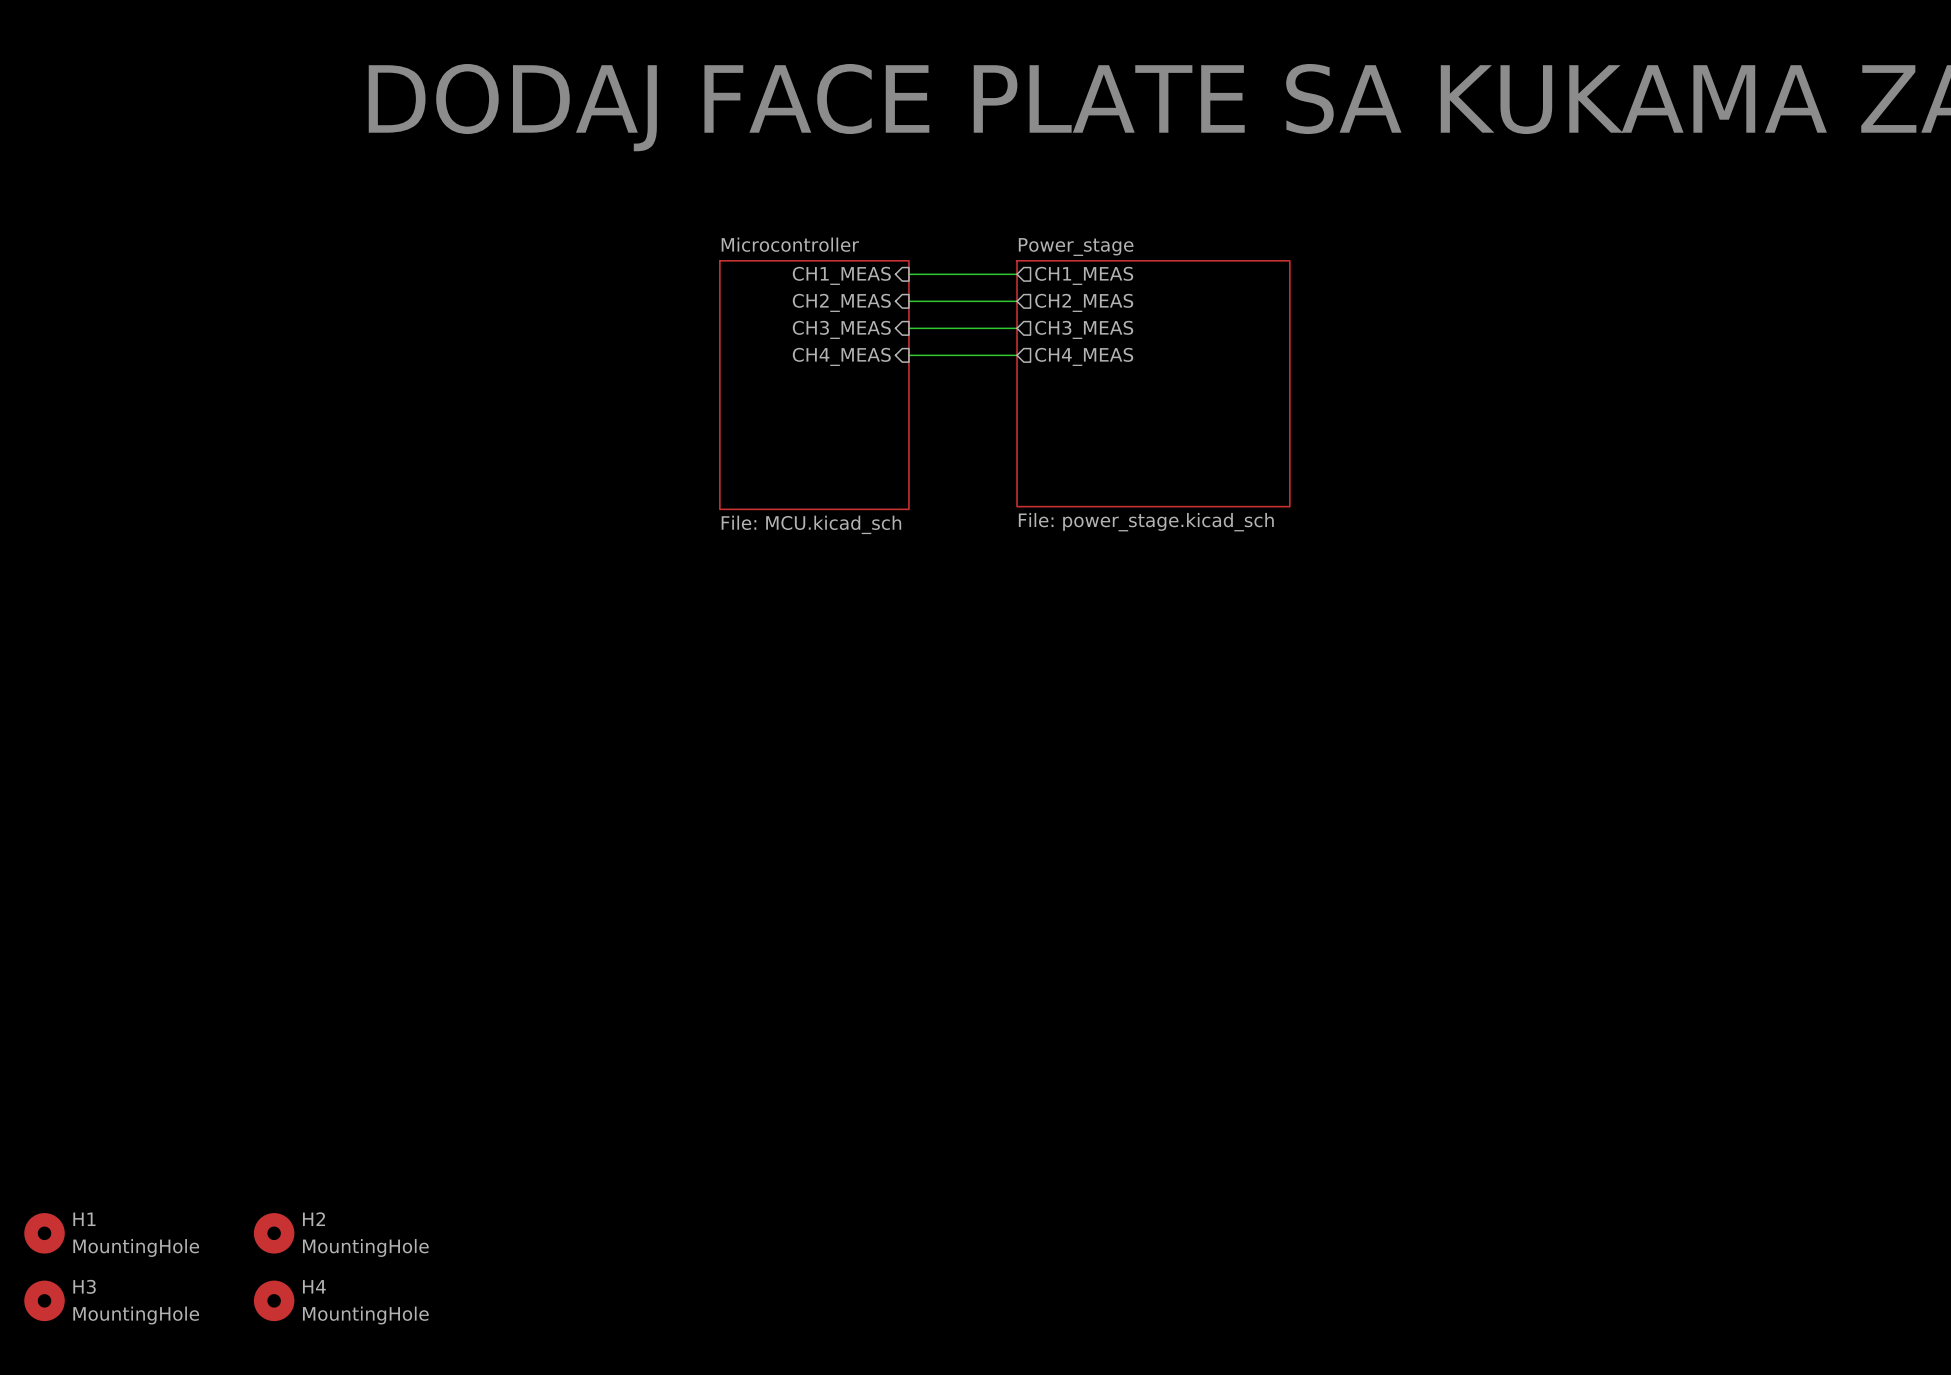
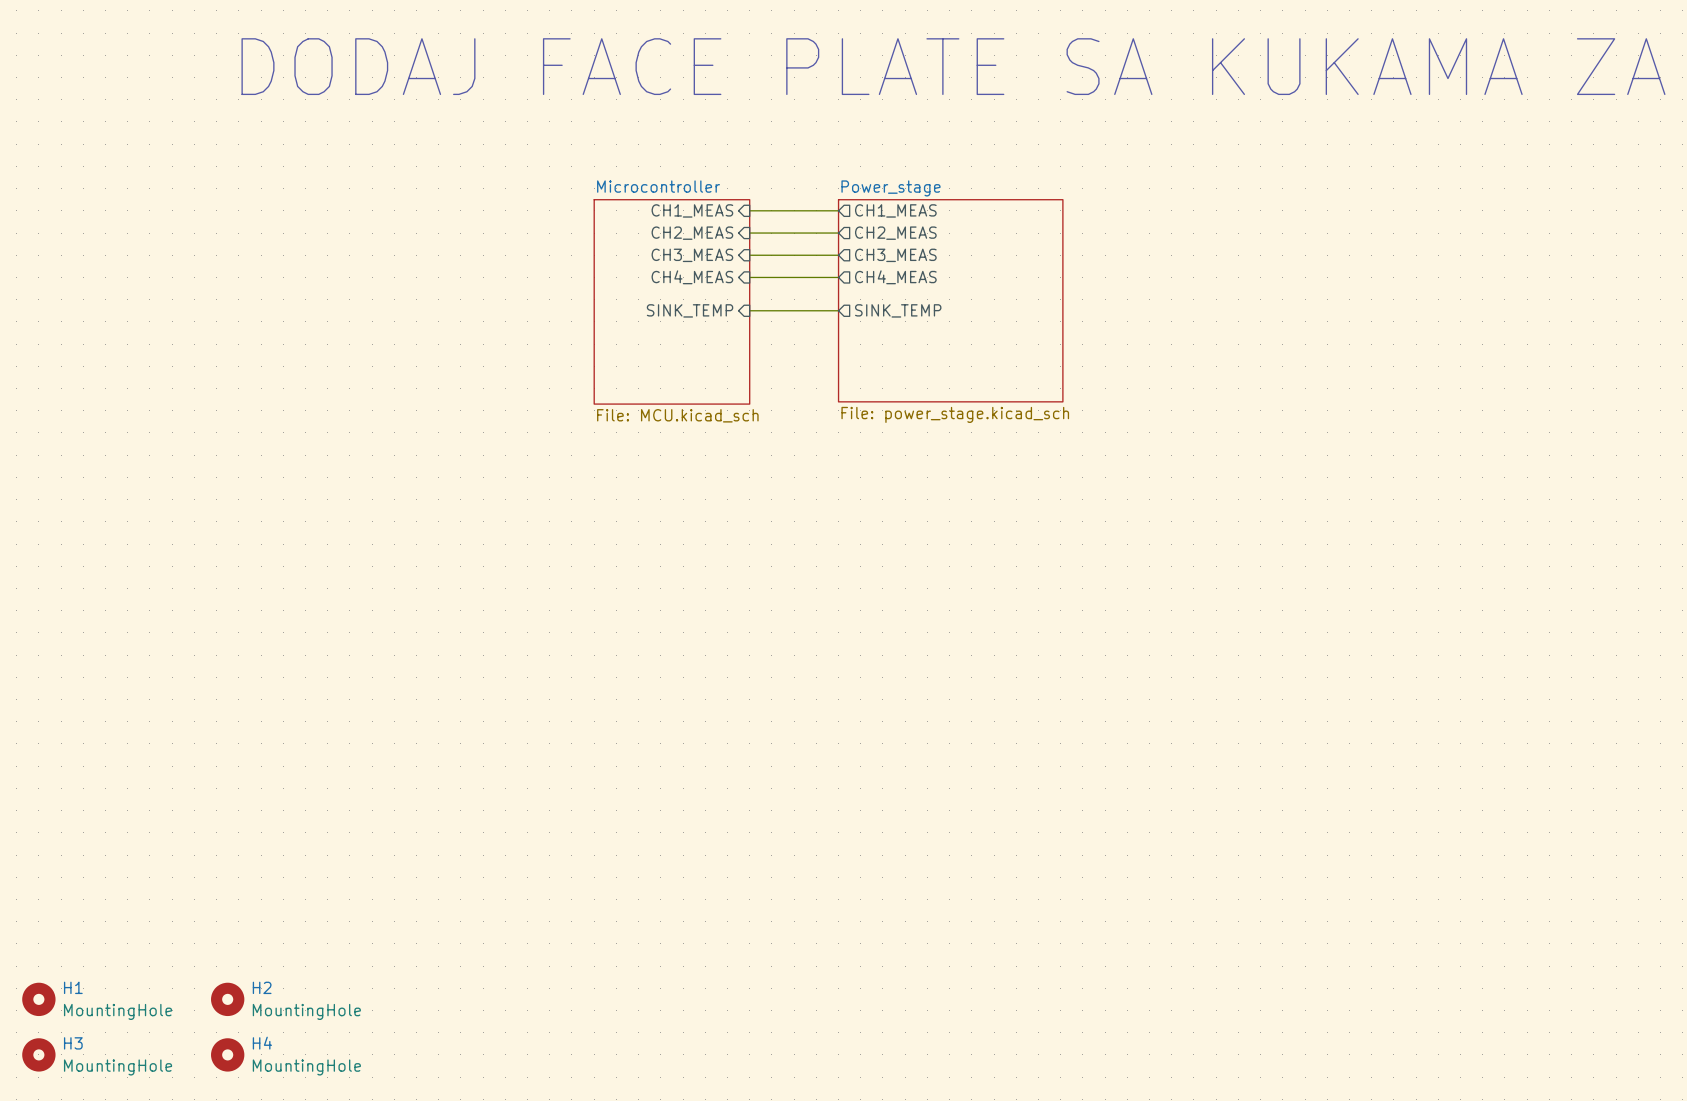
wire: none -> (749, 310) (838, 310)
sheet pin: none -> SINK_TEMP (690, 310)
sheet pin: none -> SINK_TEMP (898, 310)

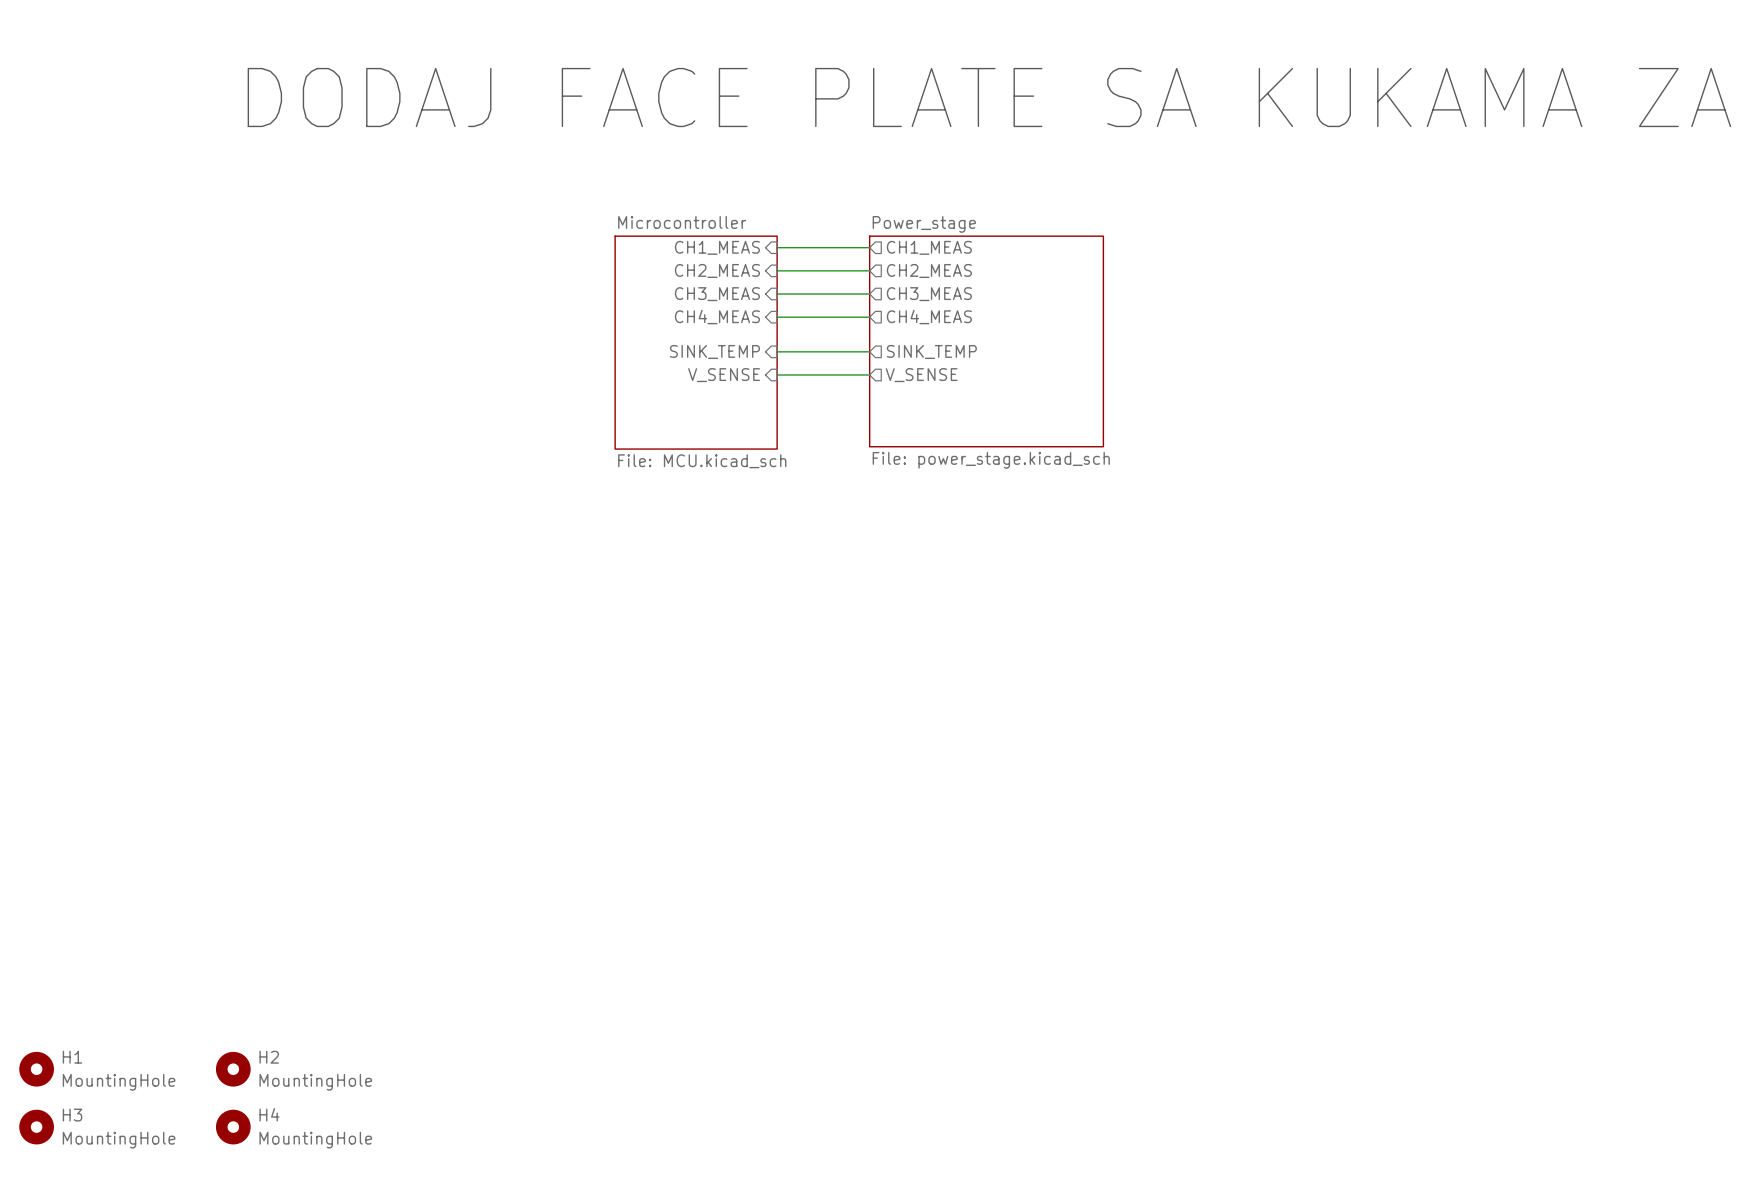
wire: none -> (777, 375) (869, 375)
sheet pin: none -> V_SENSE (724, 375)
sheet pin: none -> V_SENSE (921, 375)

